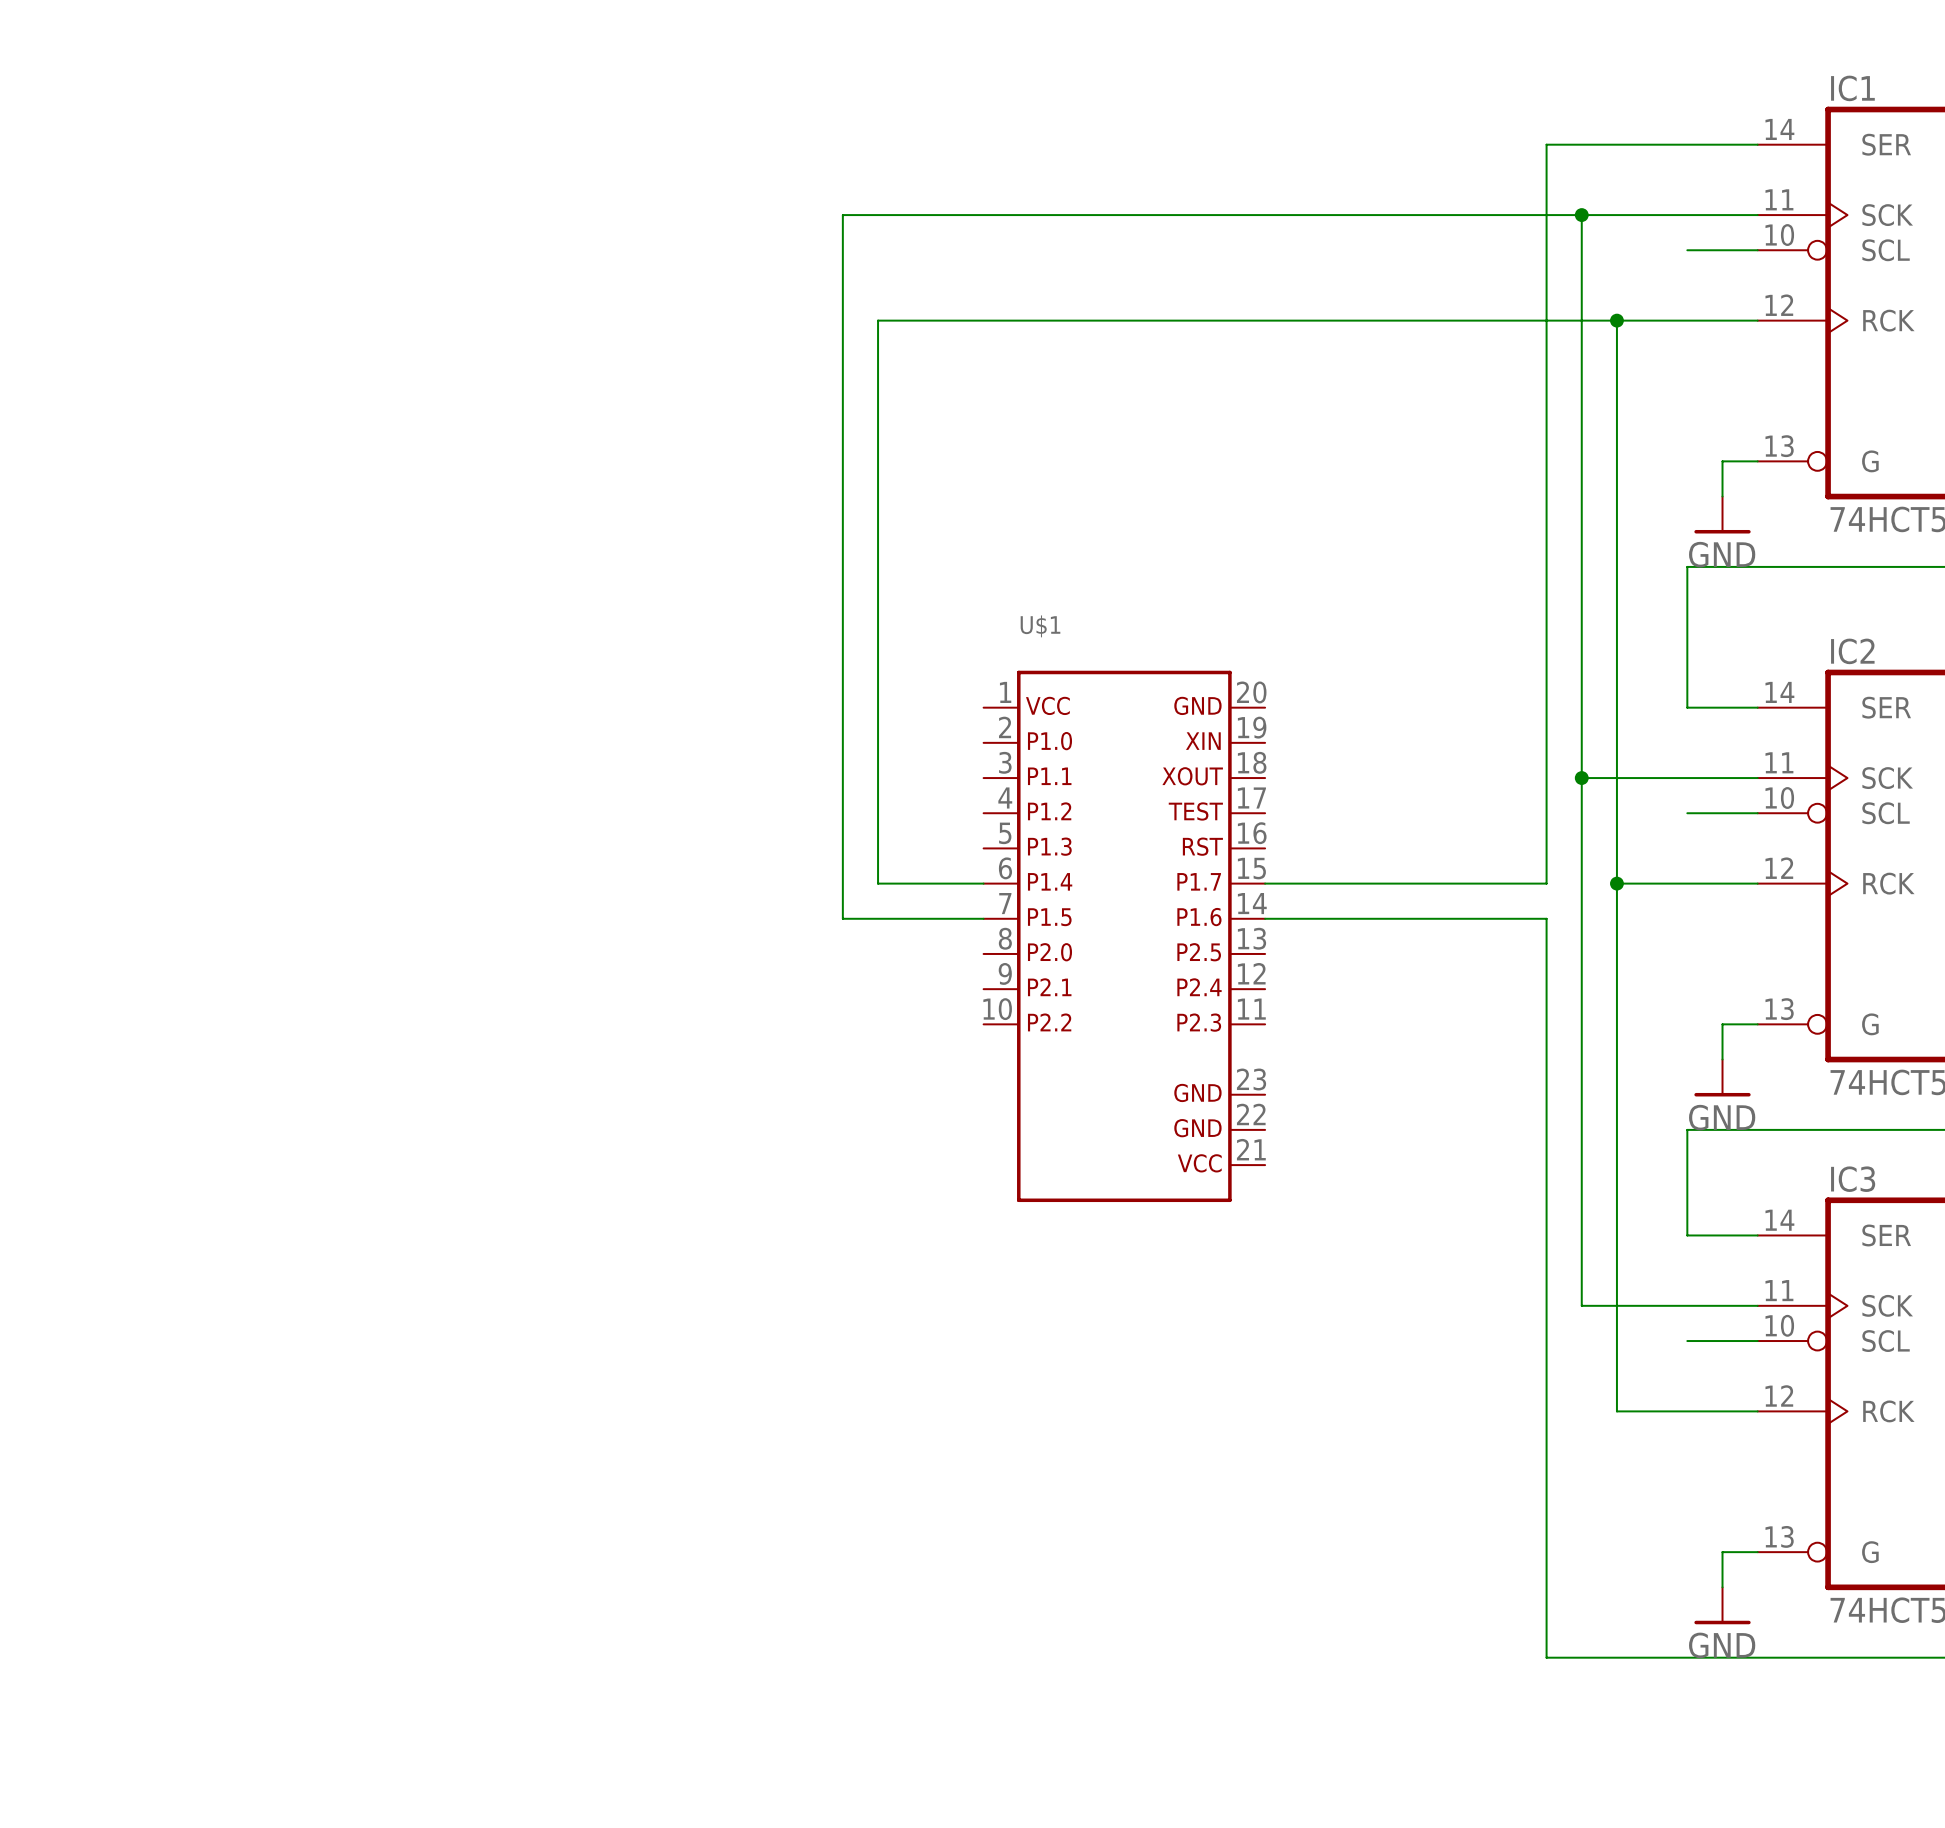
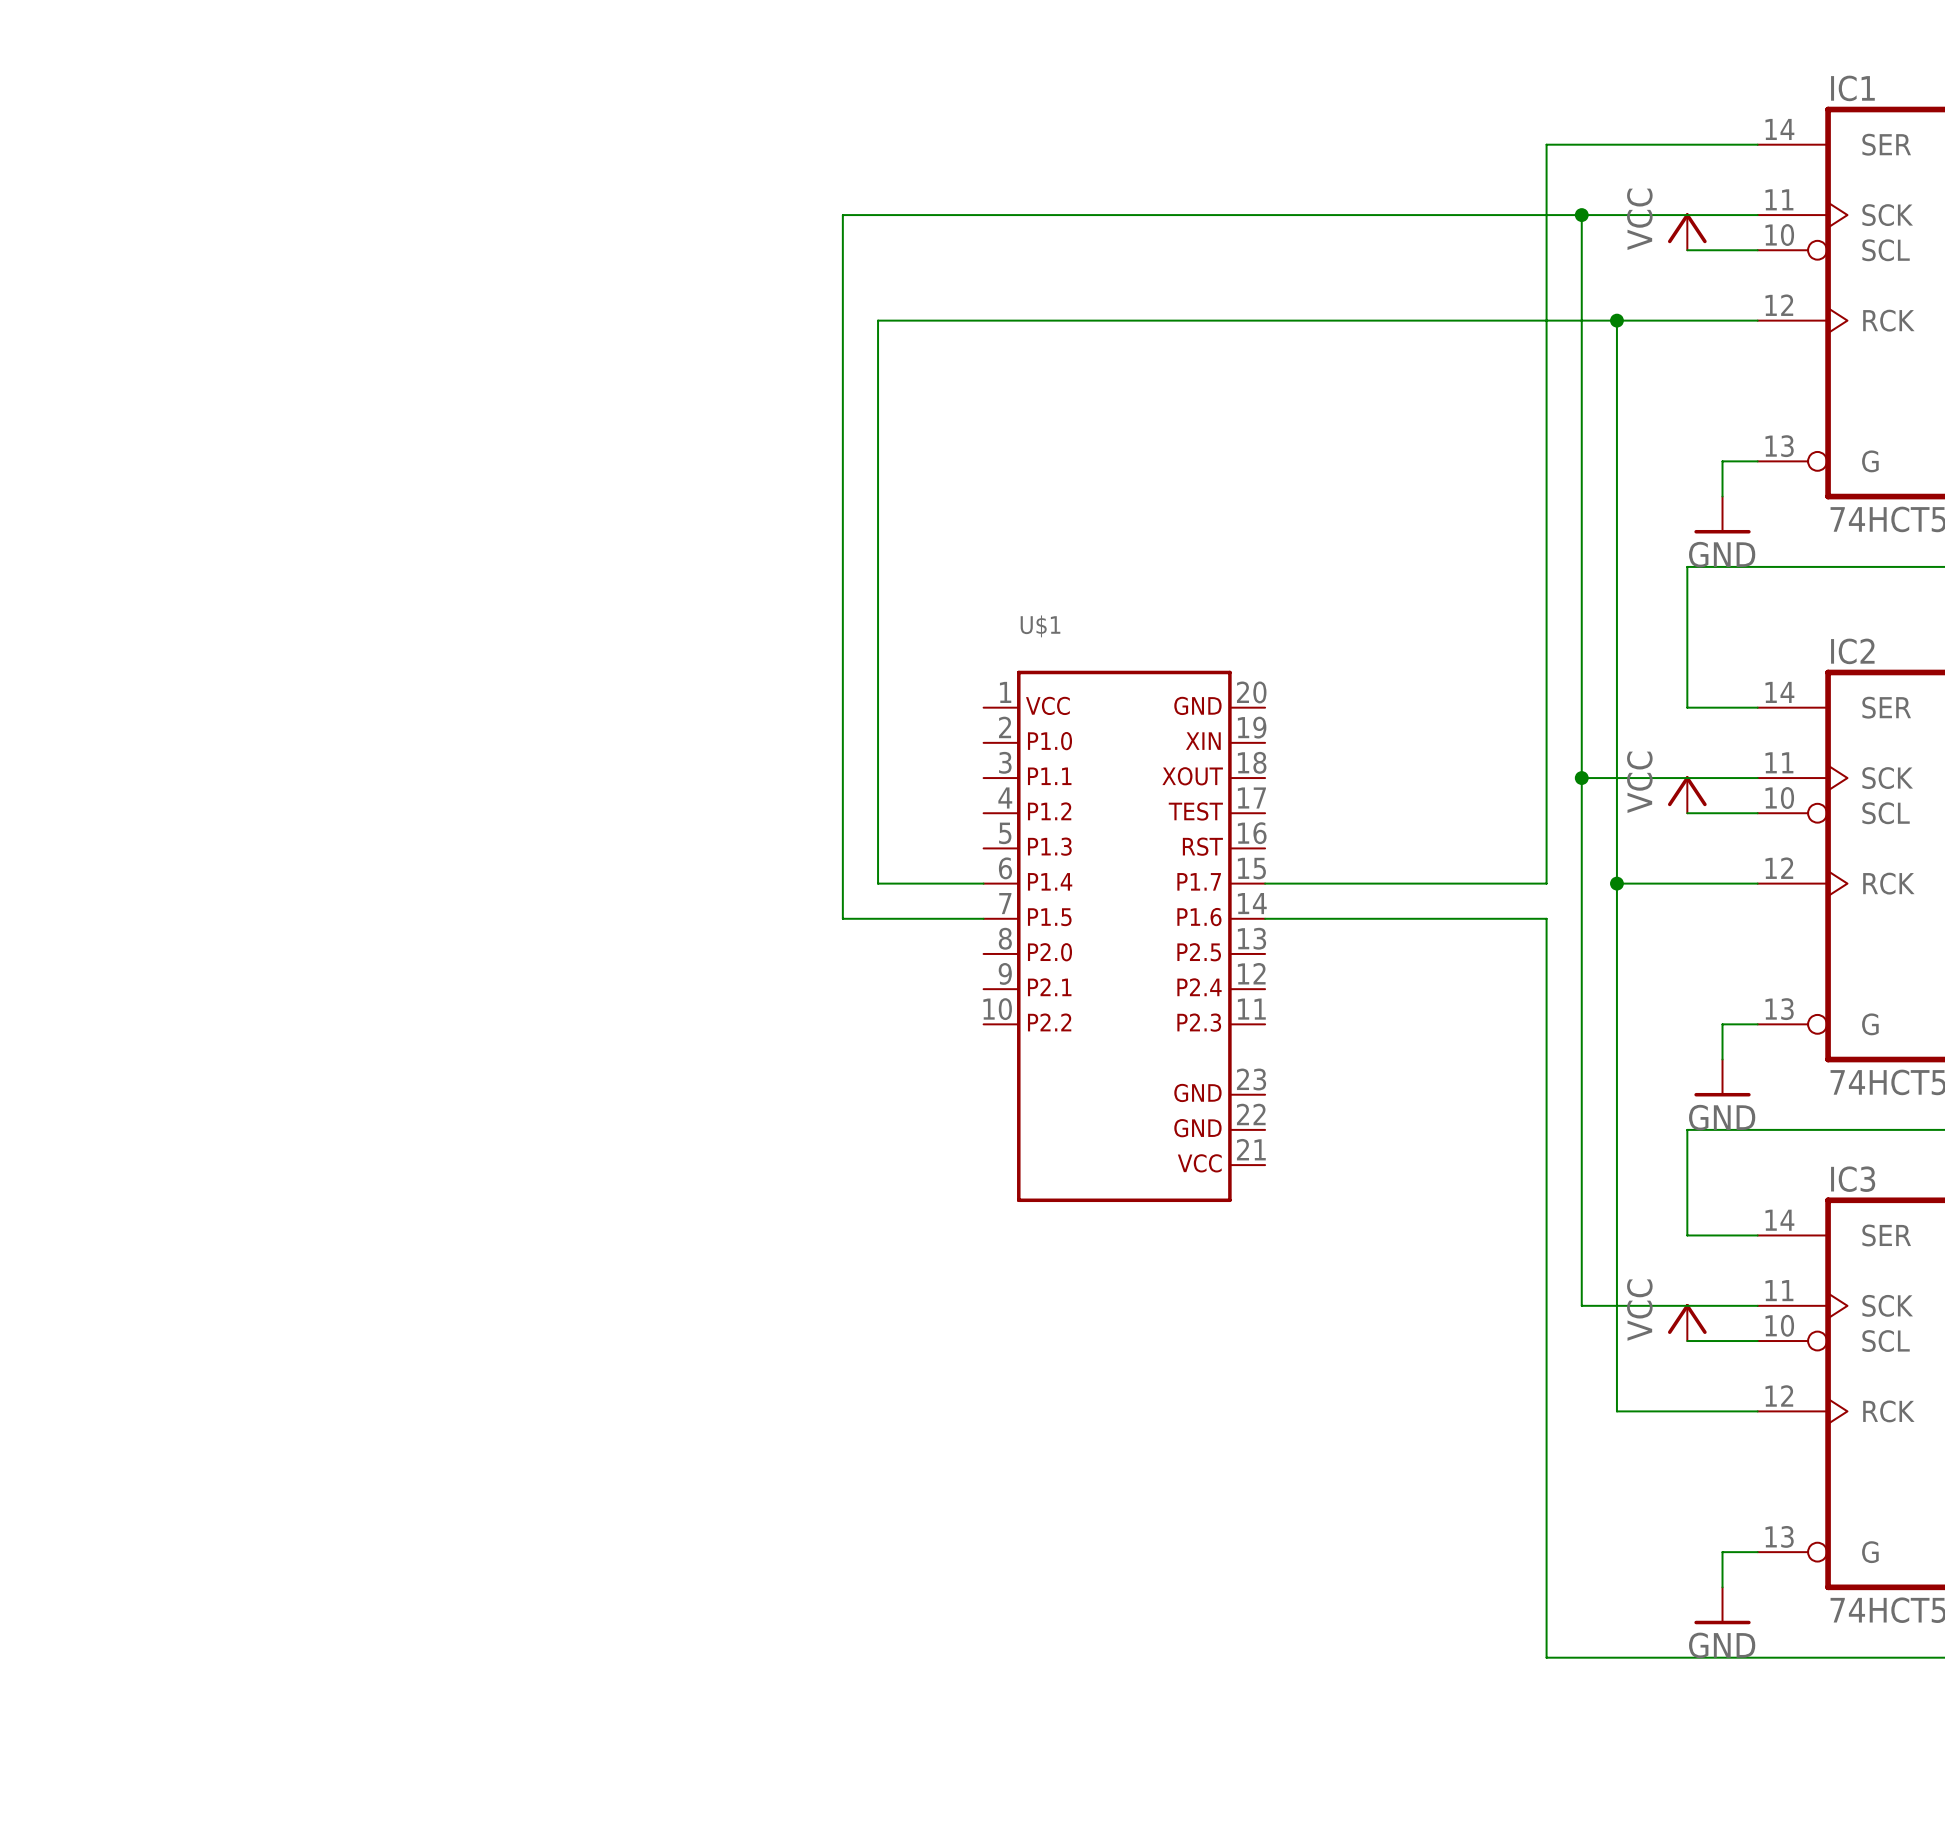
power symbol: none -> VCC (1687, 231)
power symbol: none -> VCC (1687, 794)
power symbol: none -> VCC (1687, 1322)

